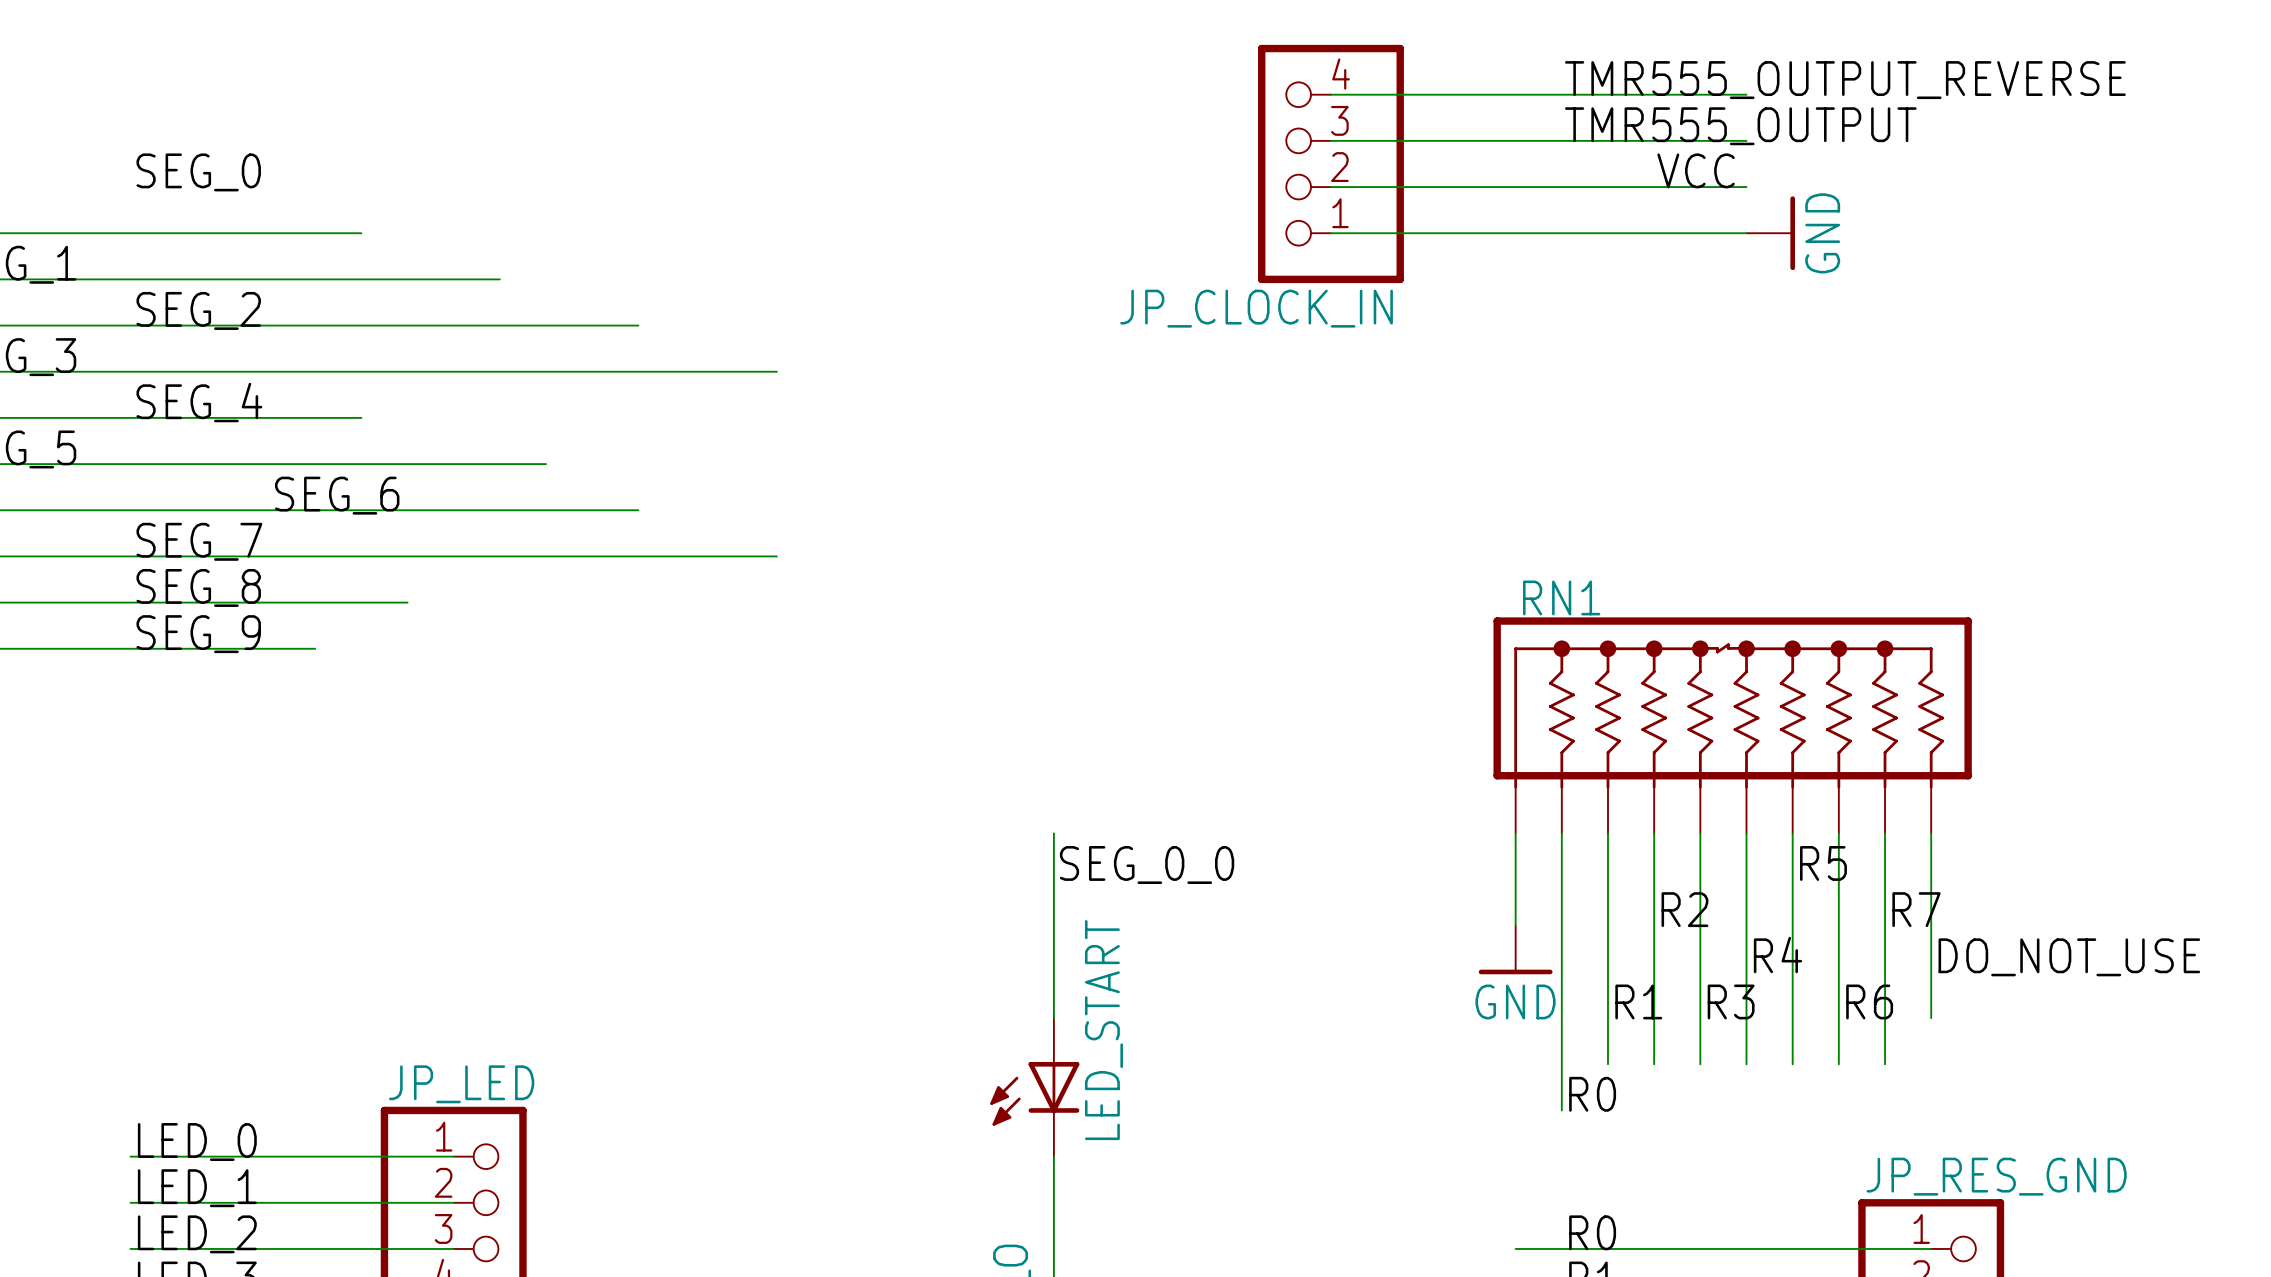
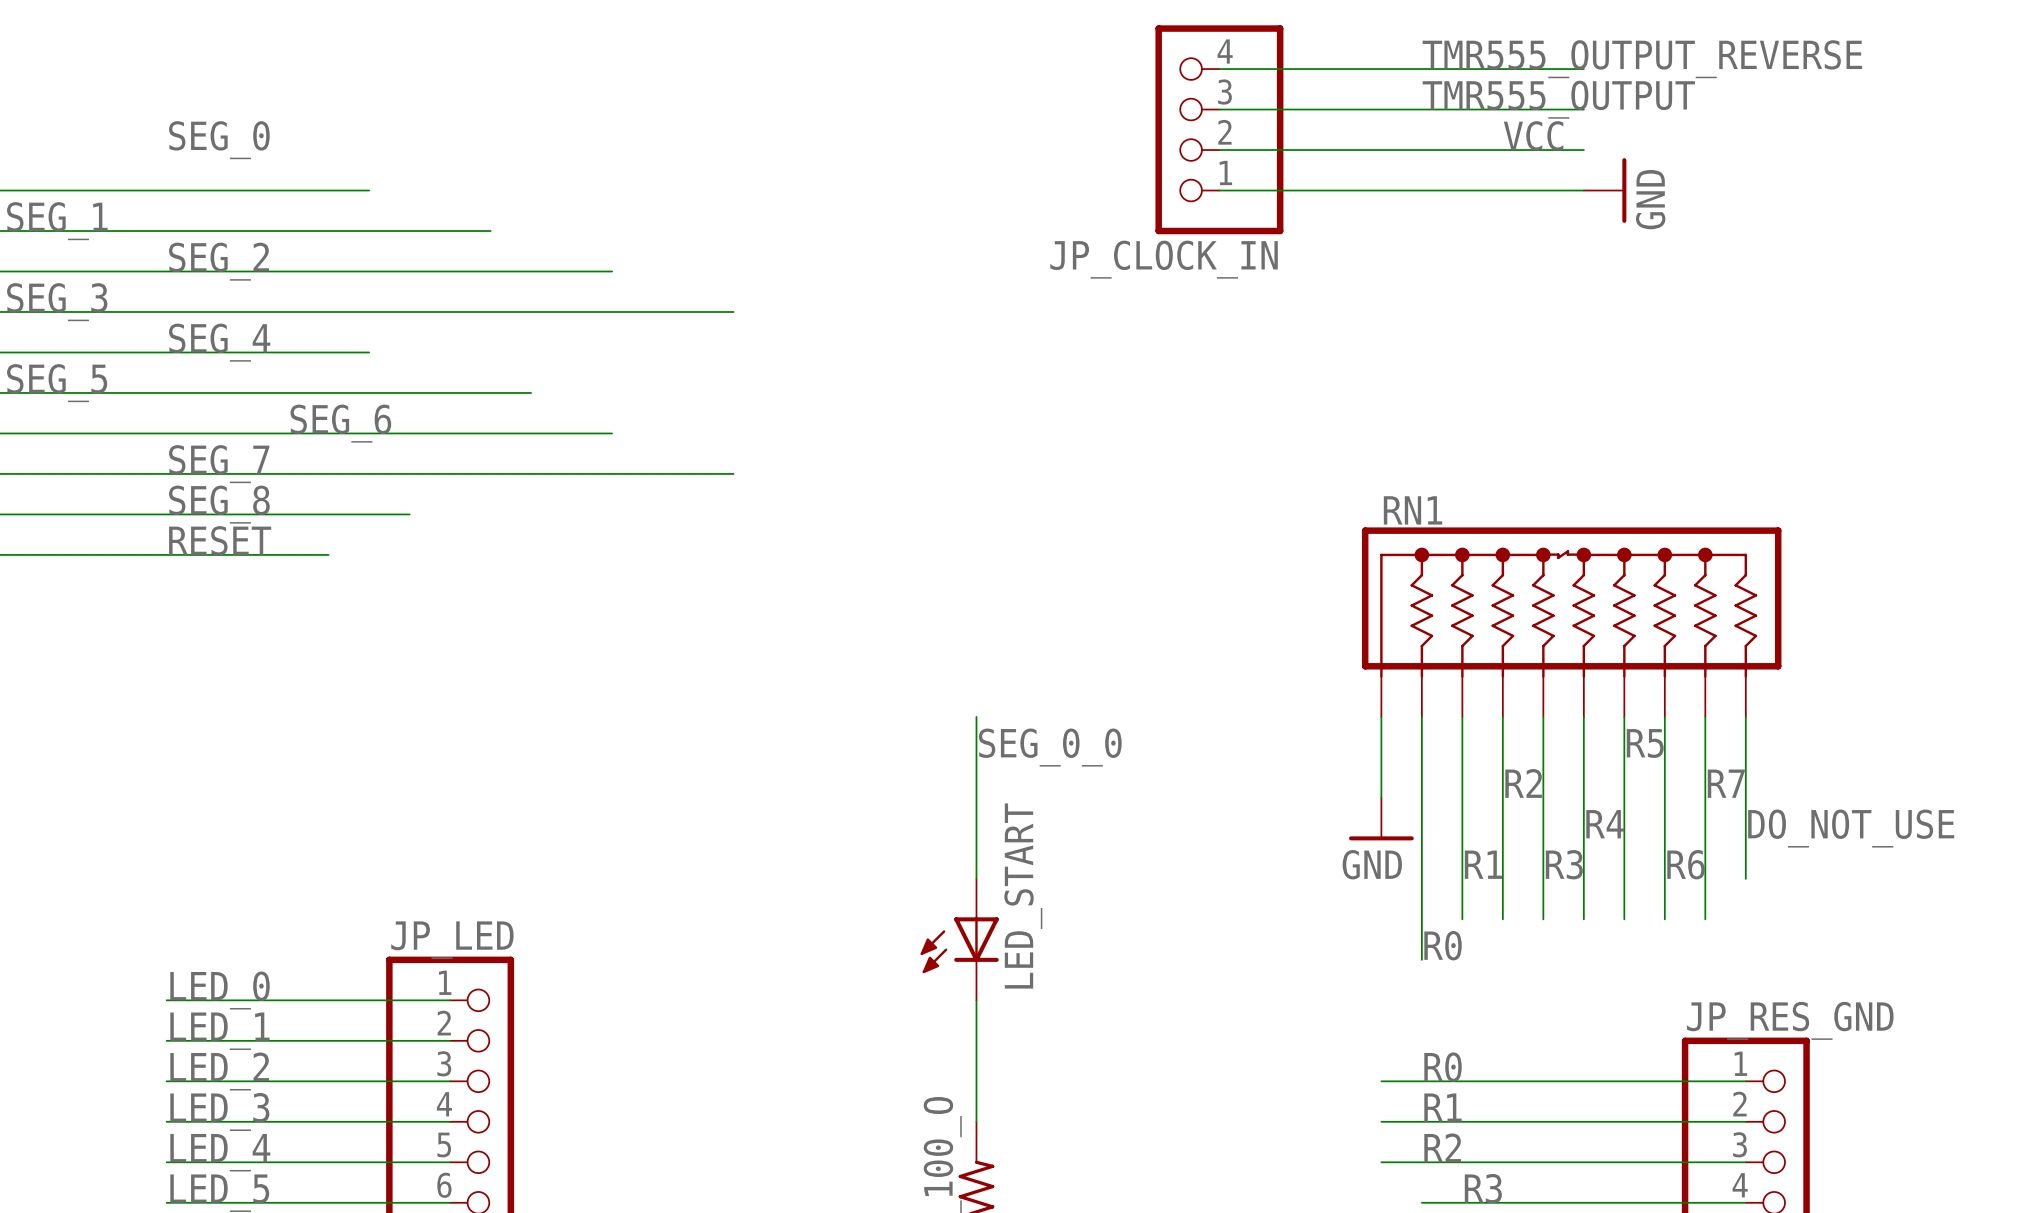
label: SEG_9 (198, 634) -> RESET (220, 540)

